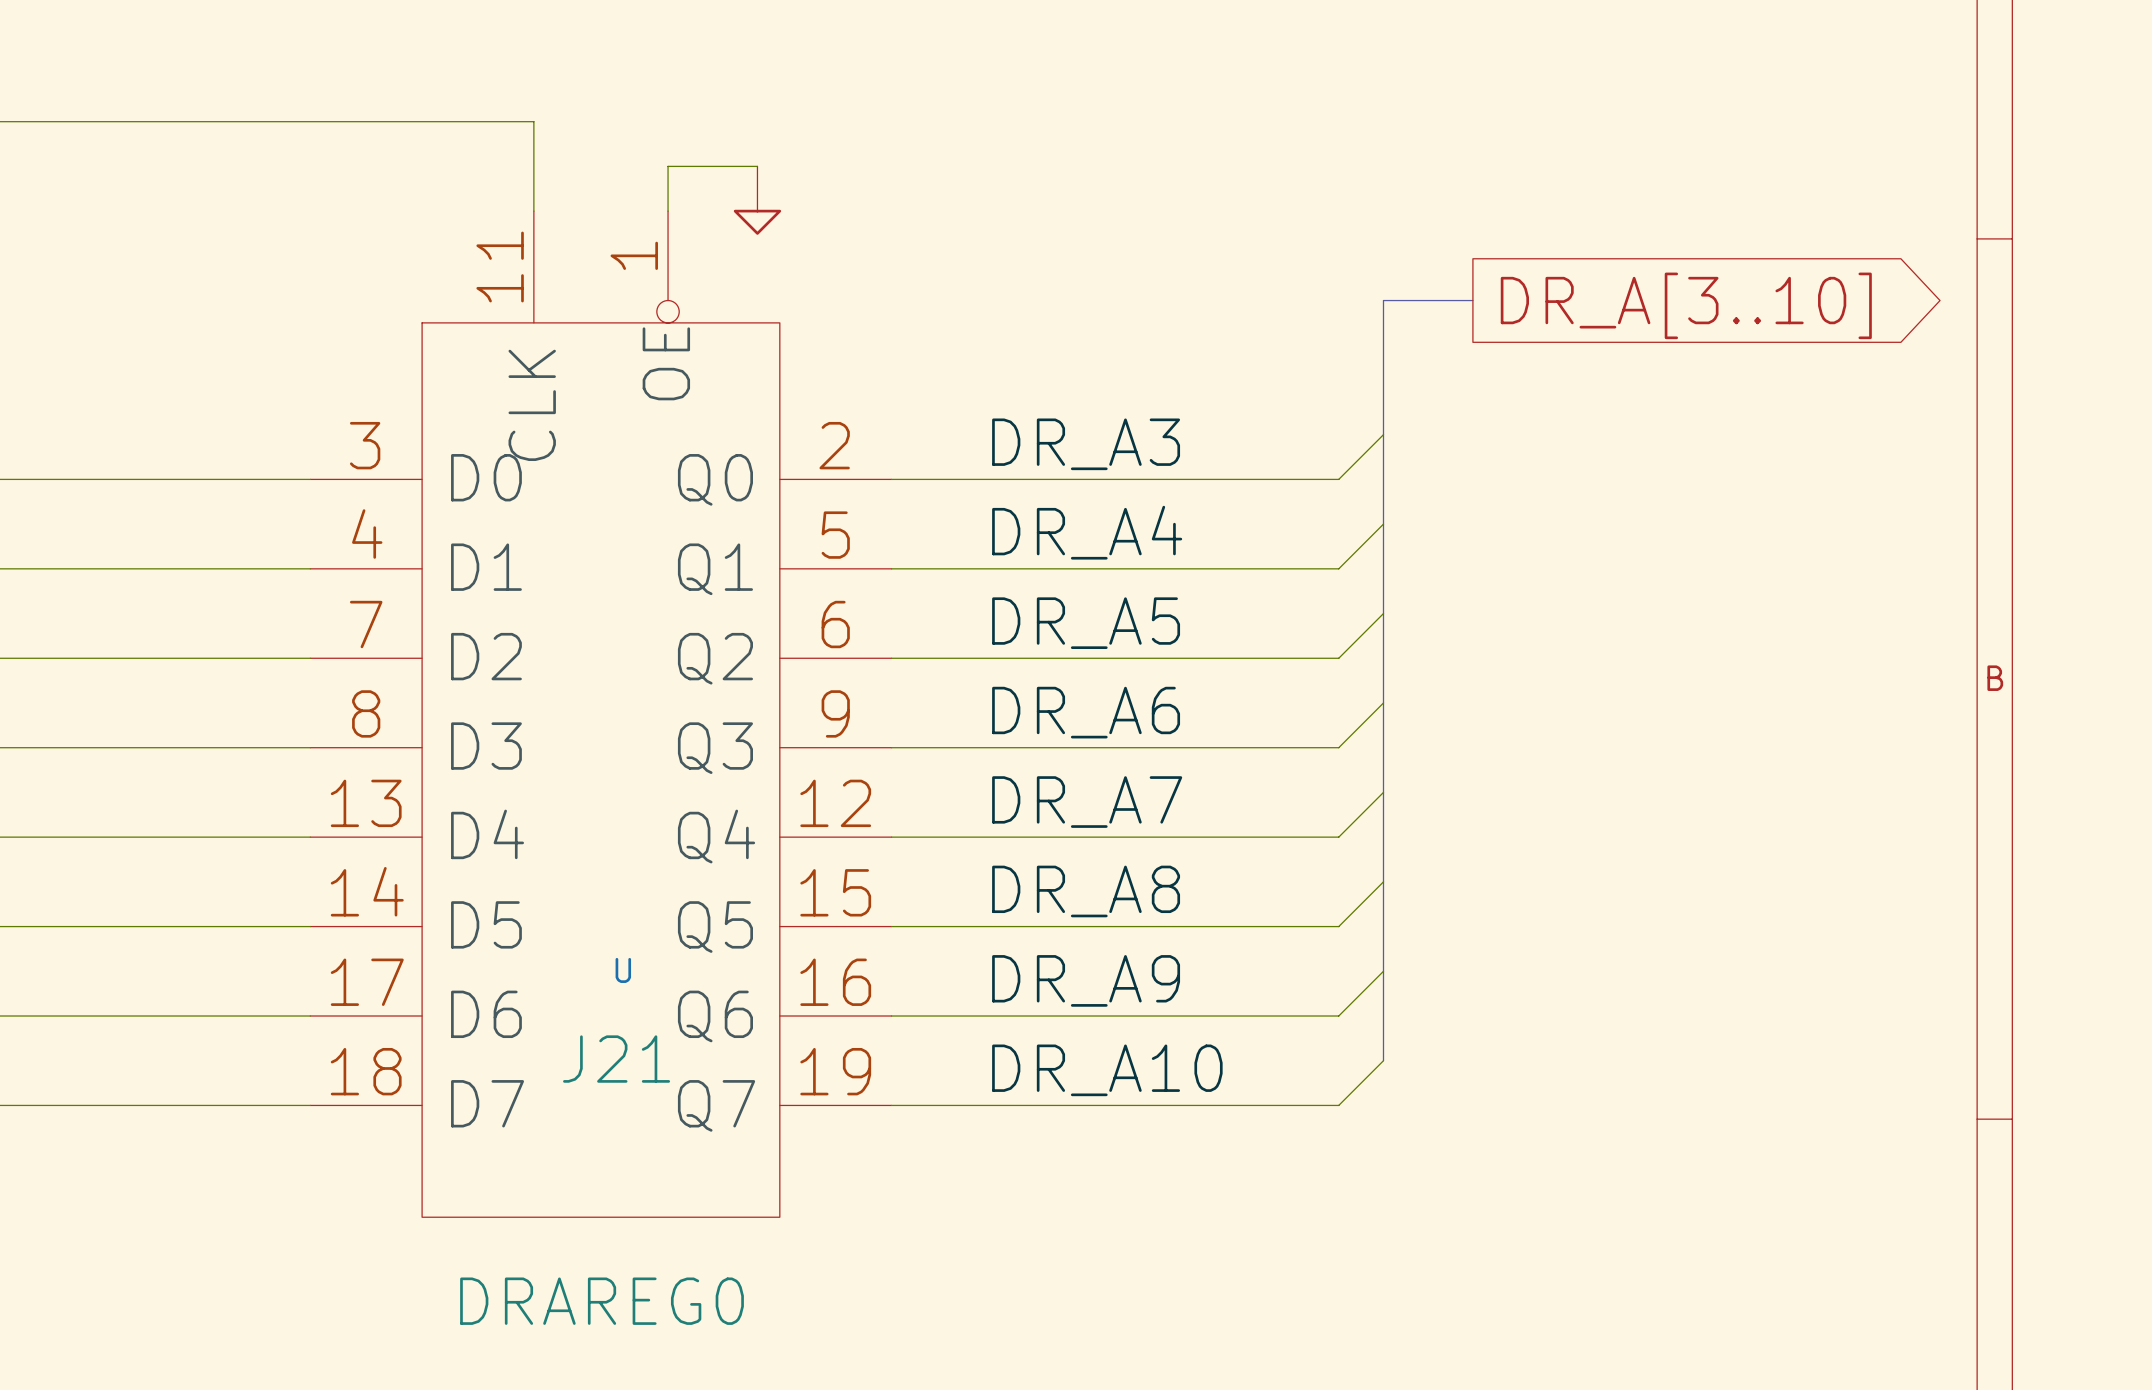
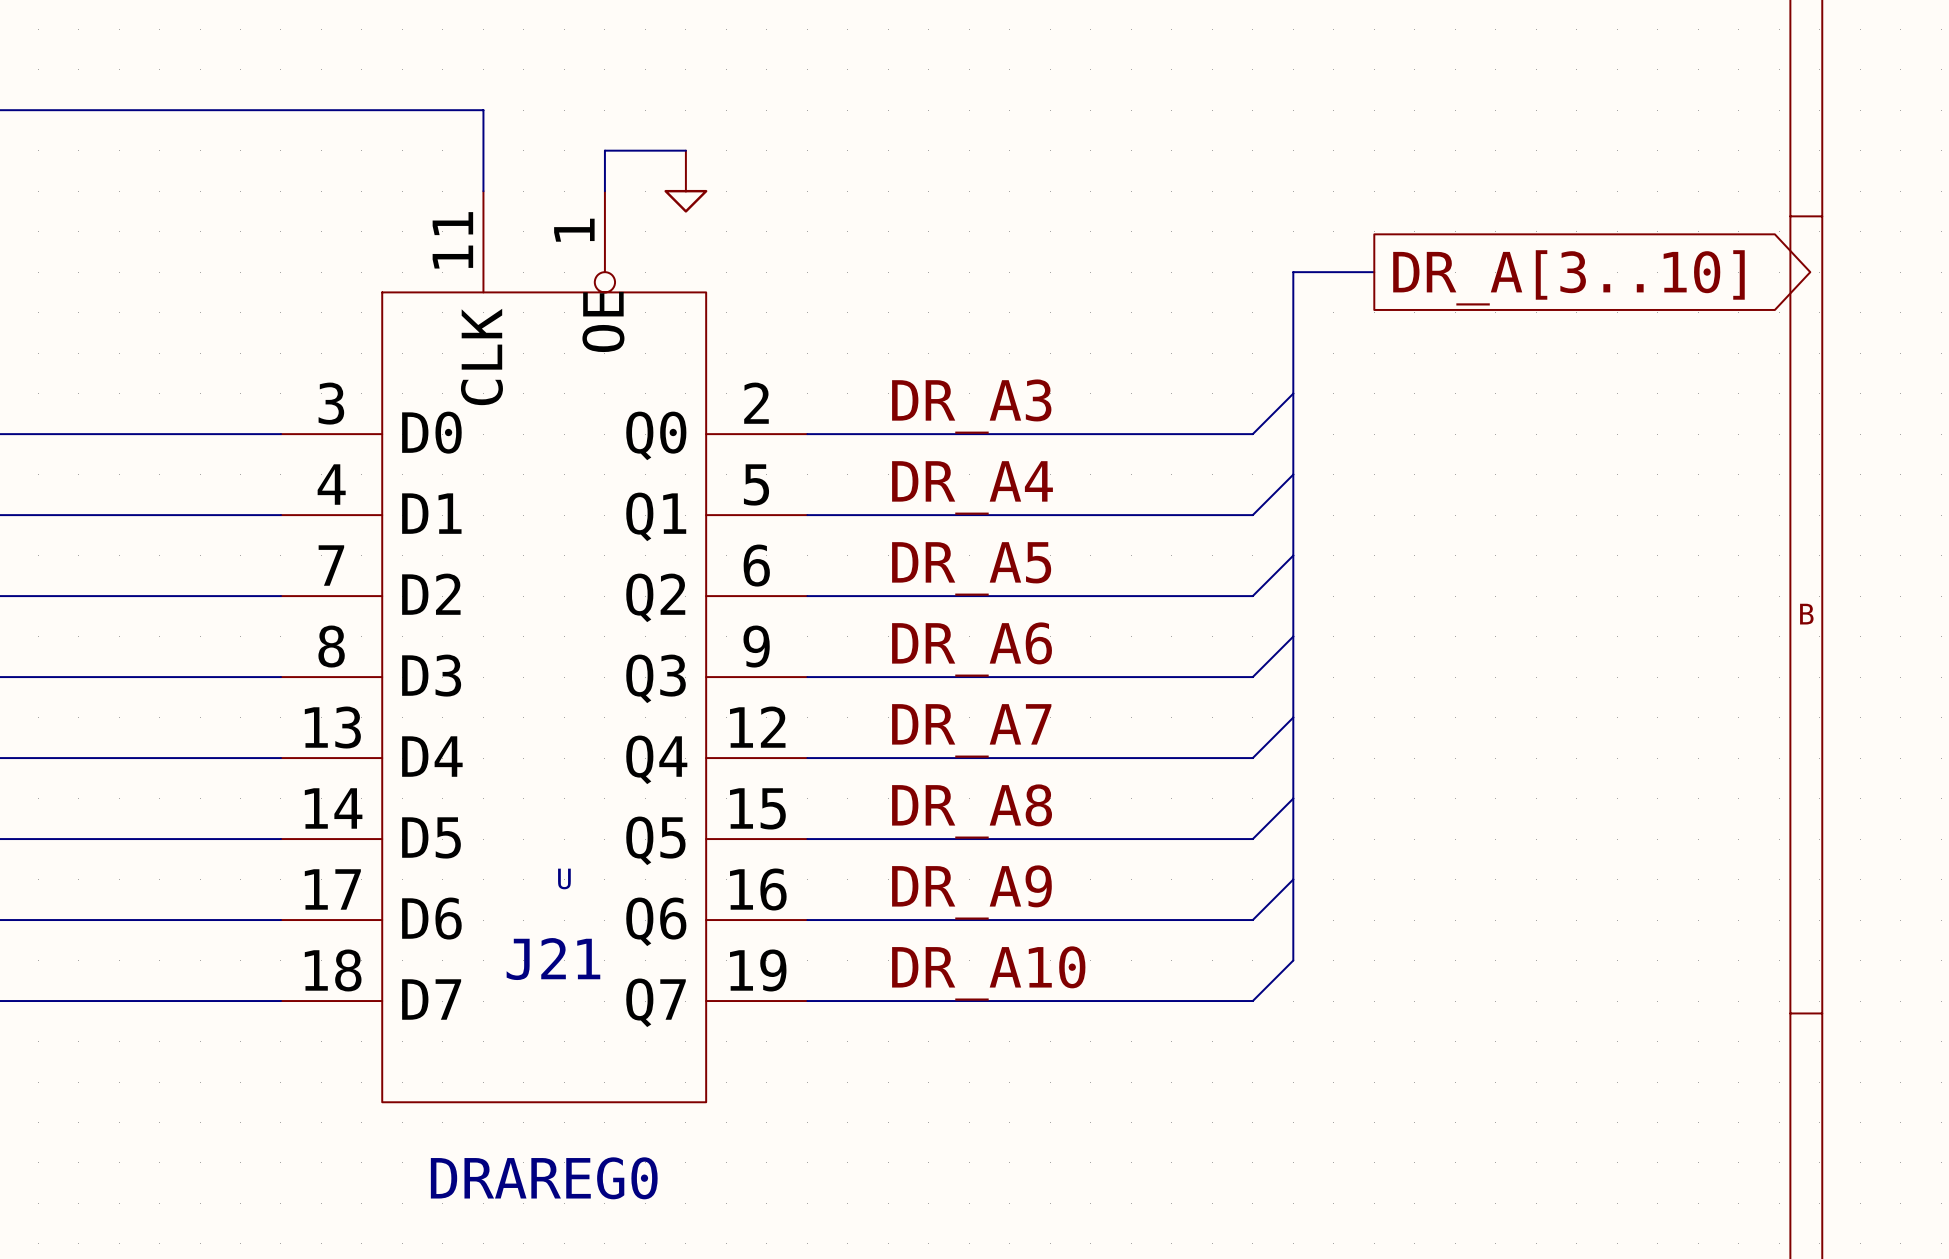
bus: (1428, 300) (1383, 300) (1383, 1060) -> (1293, 272) (1293, 960)
bus: none -> (1333, 272) (1374, 272)
global label position: DR_A[3..10] (1686, 305) -> DR_A[3..10] (1568, 277)
wire: (1383, 434) (1338, 479) -> (1293, 393) (1252, 434) (1212, 434)
wire: (1383, 524) (1338, 568) -> (1293, 474) (1252, 515) (1212, 515)
wire: (1383, 613) (1338, 658) -> (1293, 555) (1252, 596) (1212, 596)
wire: (1383, 702) (1338, 747) -> (1293, 636) (1252, 677) (1212, 677)
wire: (1383, 792) (1338, 837) -> (1293, 717) (1252, 758) (1212, 758)
wire: (1383, 881) (1338, 926) -> (1293, 798) (1252, 839) (1212, 839)
wire: (1383, 971) (1338, 1016) -> (1293, 879) (1252, 920) (1212, 920)
wire: (1383, 1060) (1338, 1105) -> (1293, 960) (1252, 1001) (1212, 1001)

